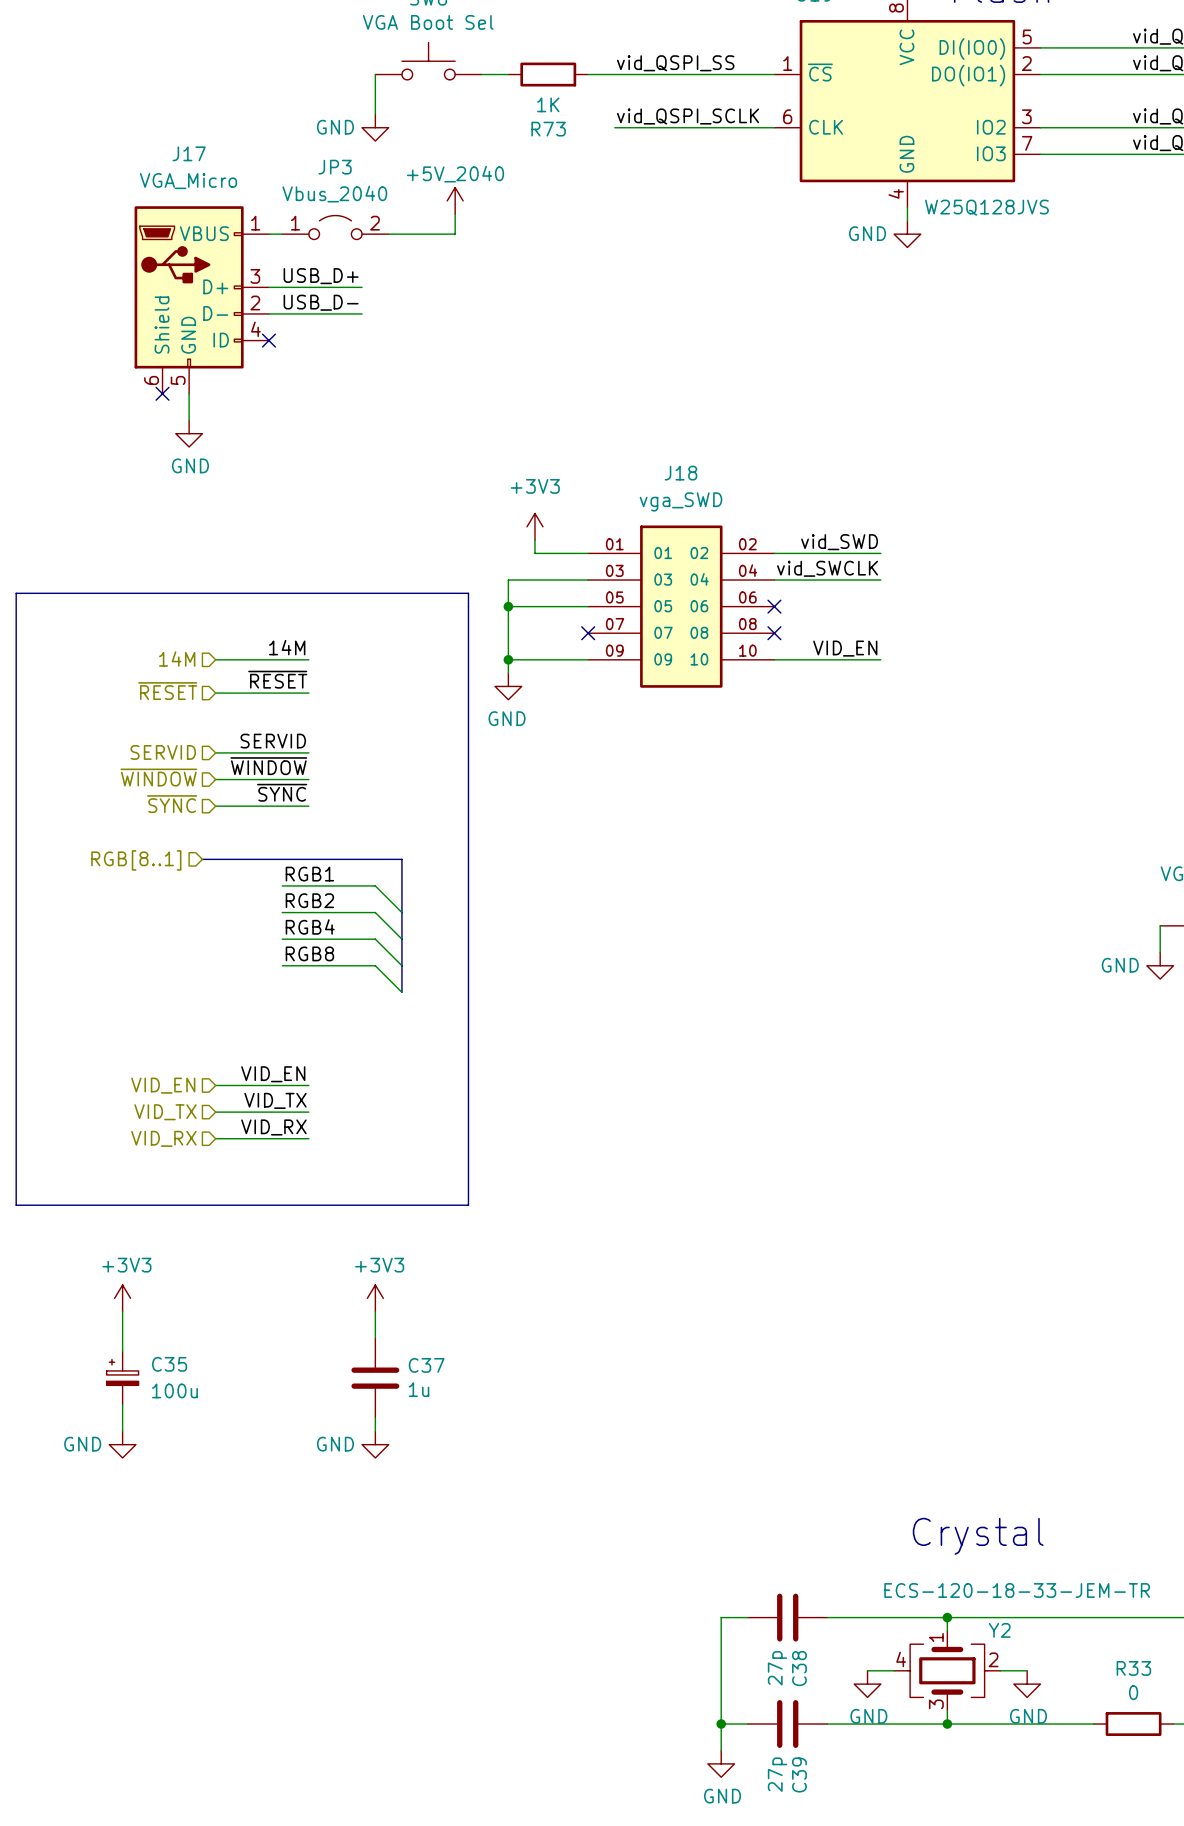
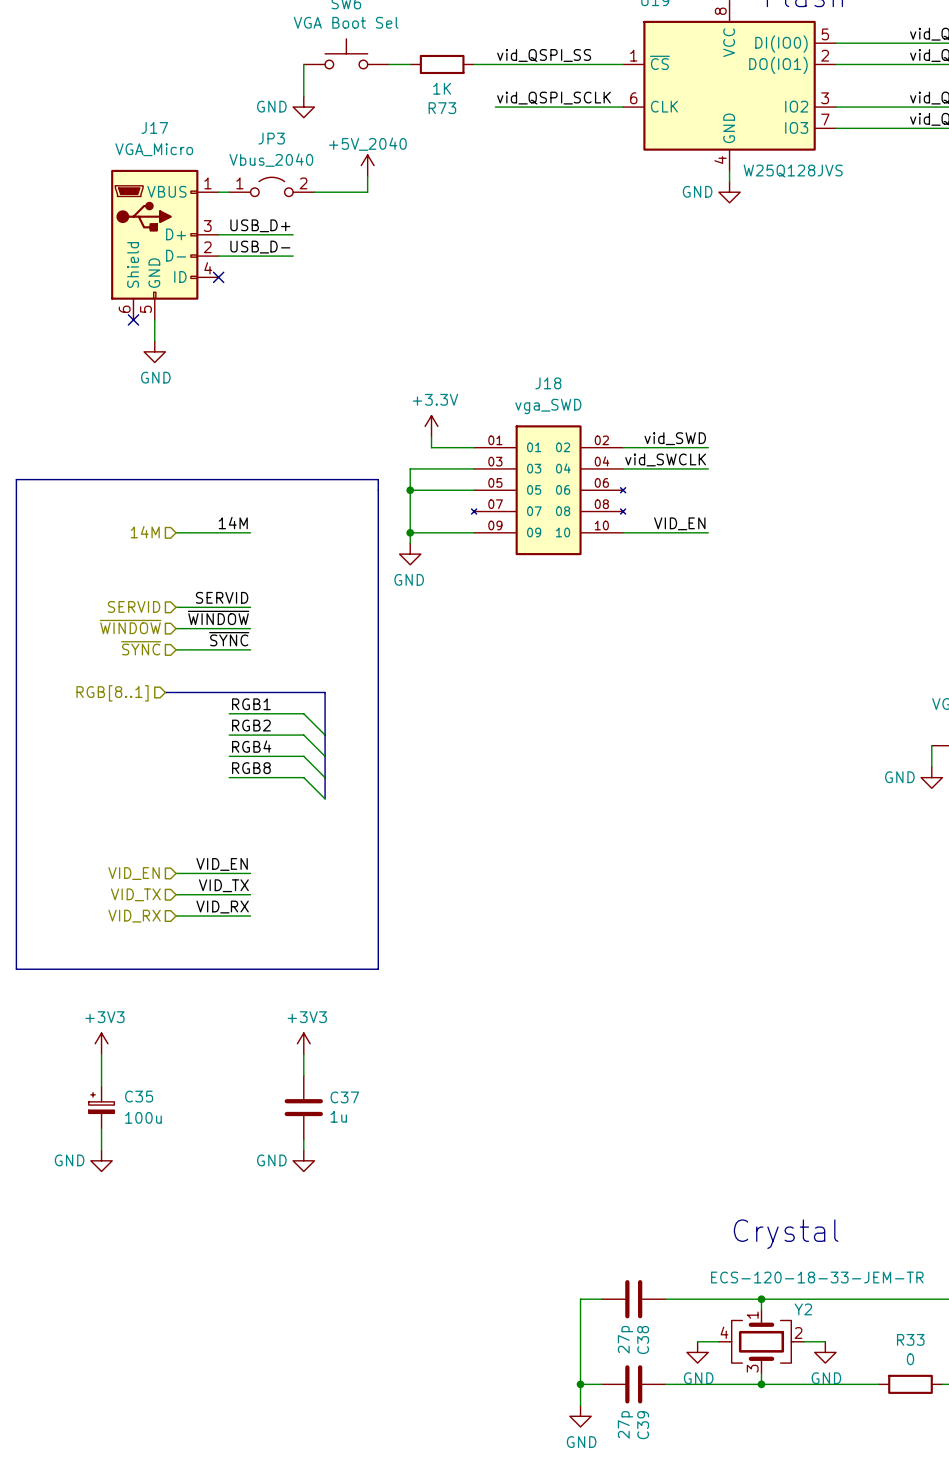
J18 symbol: [588, 525, 775, 688] -> [471, 425, 626, 556]
power symbol: +3V3 (534, 526) -> +3.3V (431, 426)
no-connect mark: (774, 606) -> none
no-connect mark: (588, 633) -> none
no-connect mark: (774, 633) -> none
label: ~{RESET} (277, 679) -> none
hierarchical label: ~{RESET} (167, 691) -> none
wire: (215, 693) (308, 693) -> none

